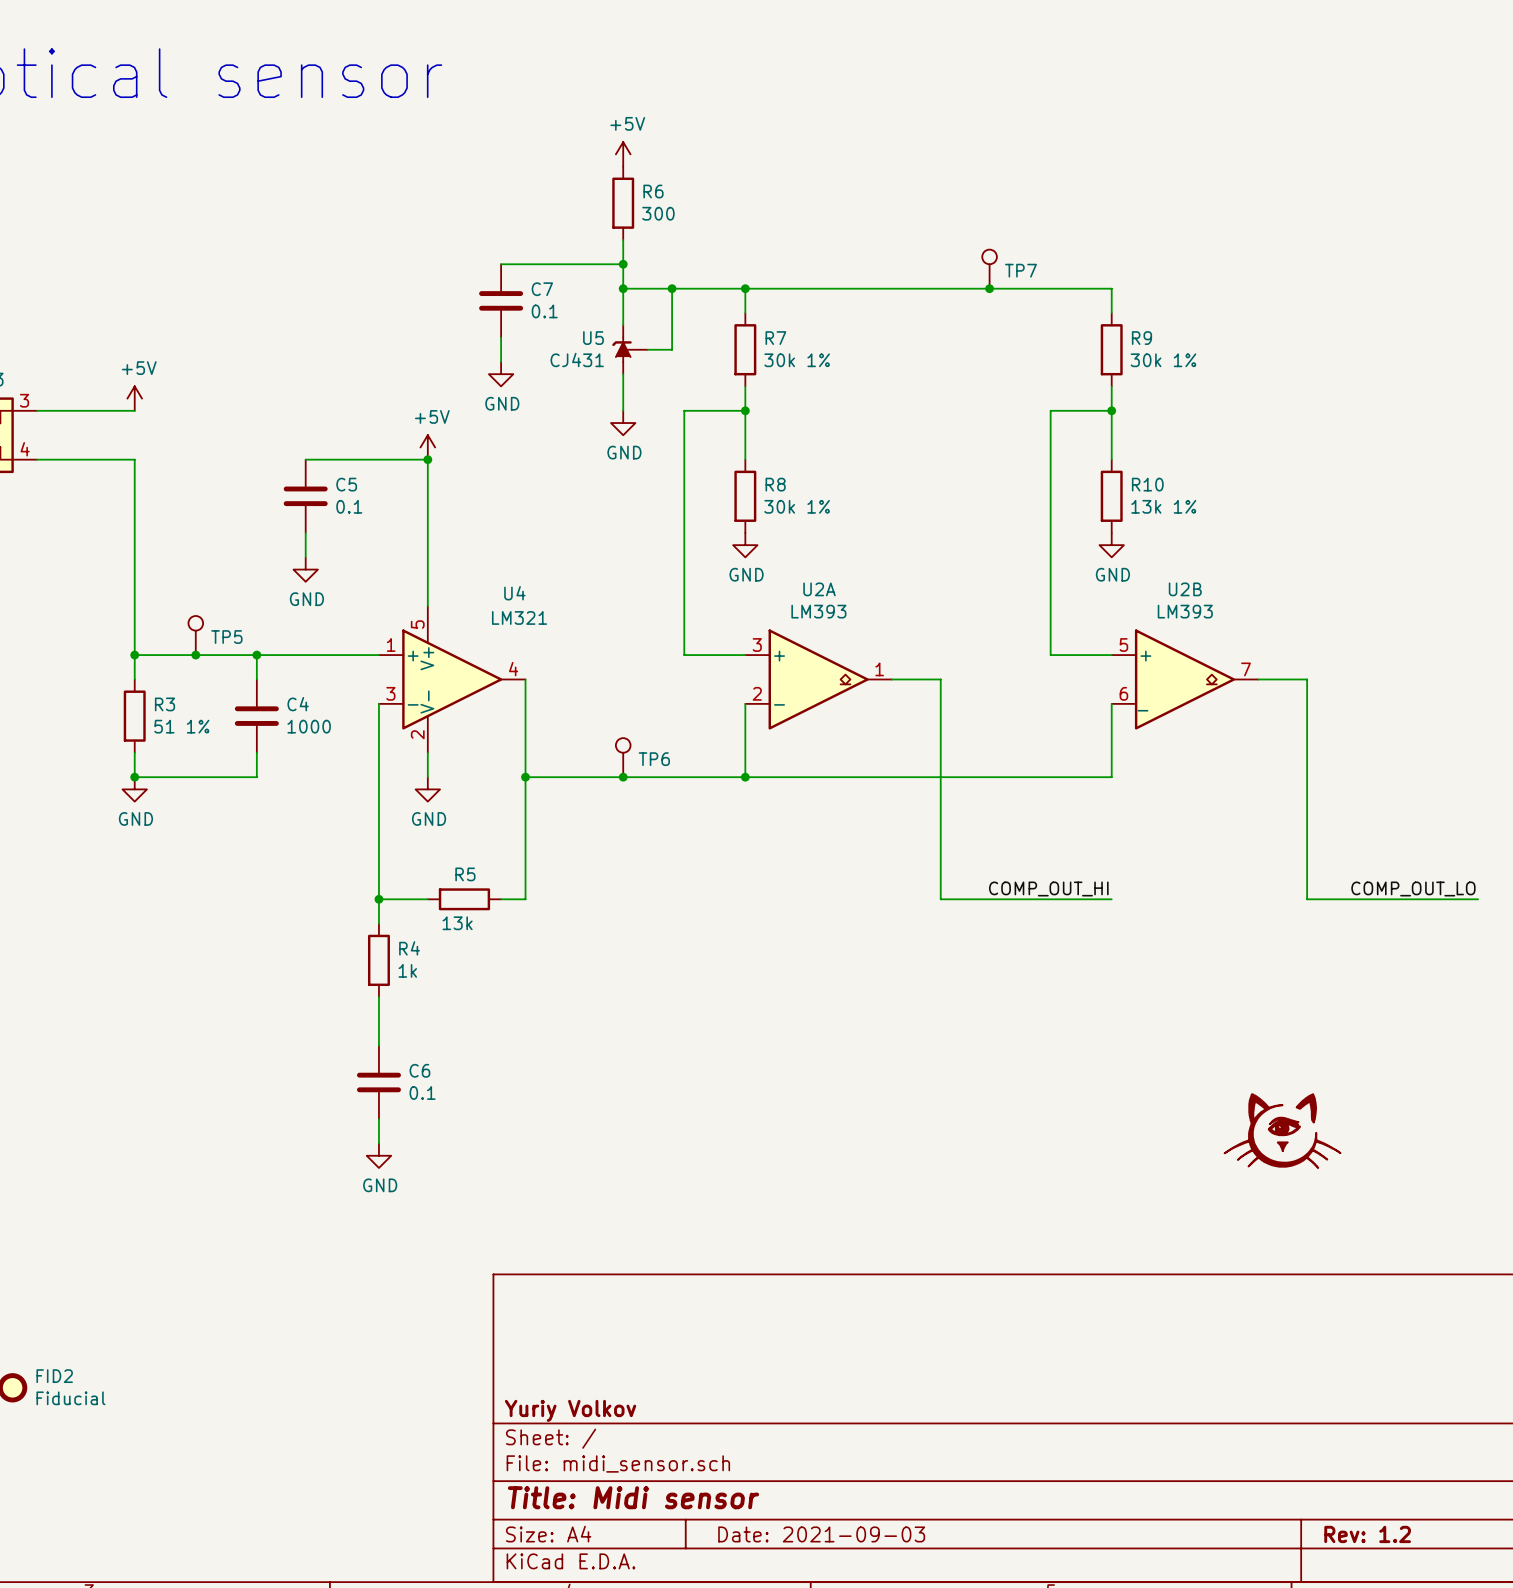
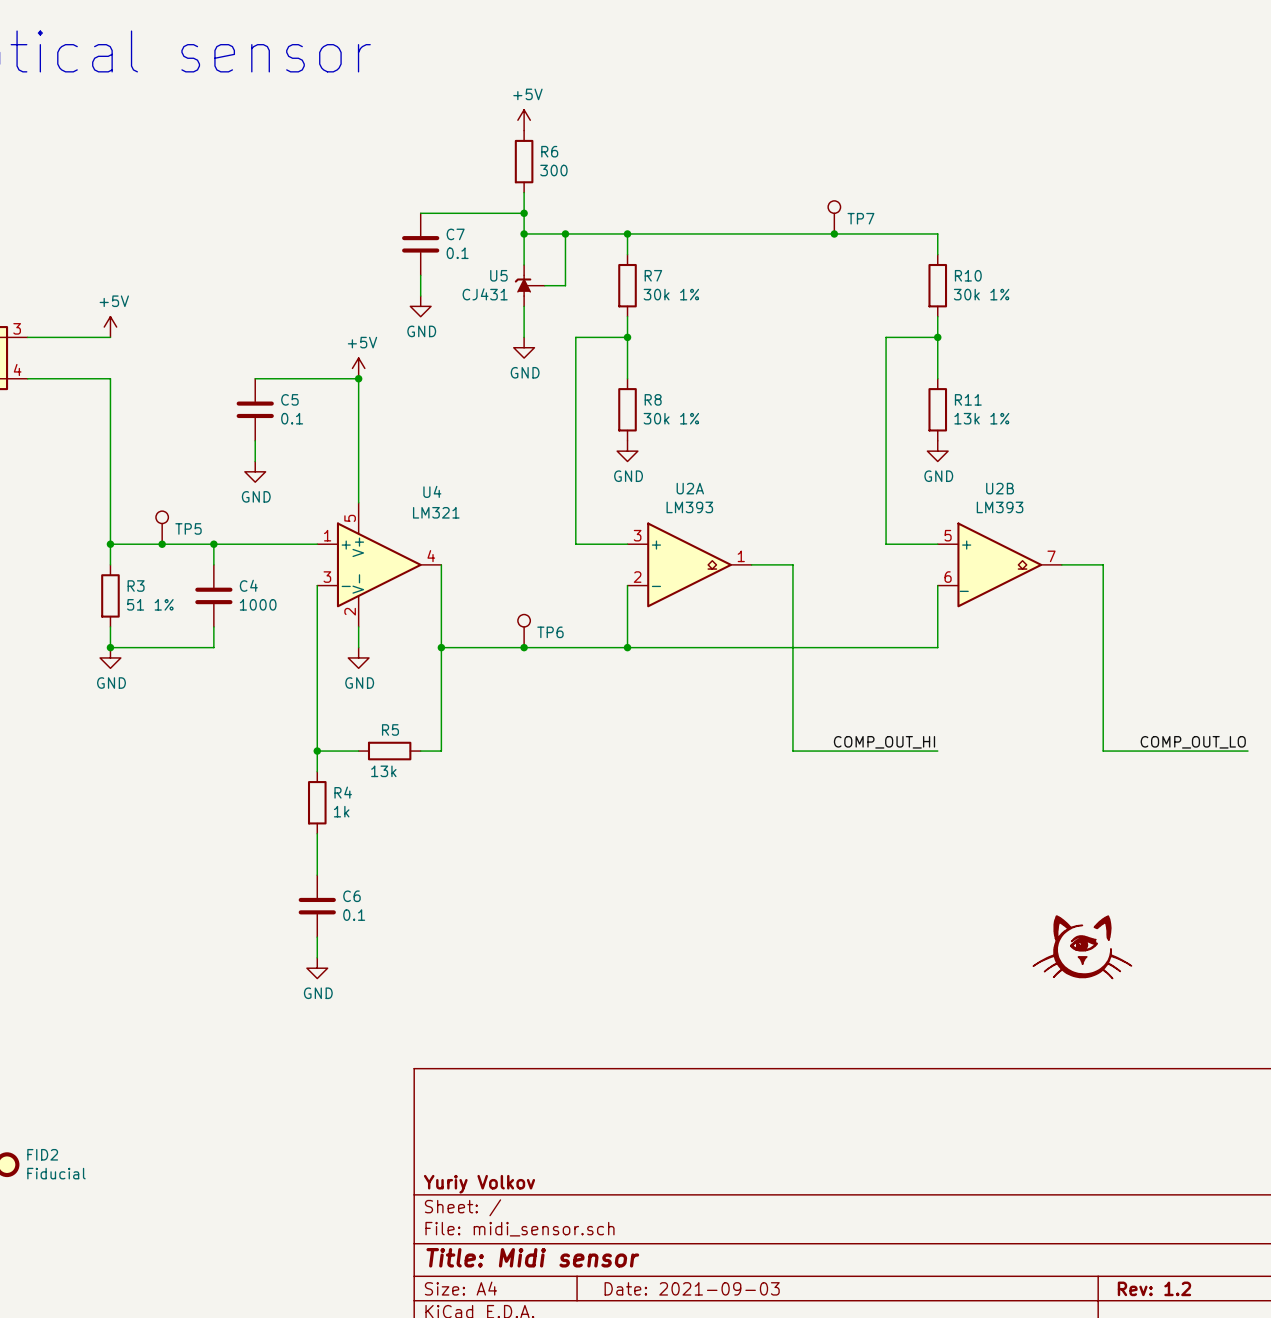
R9 name: R9 (1141, 338) -> R10 (968, 275)
R10 name: R10 (1147, 484) -> R11 (968, 399)

